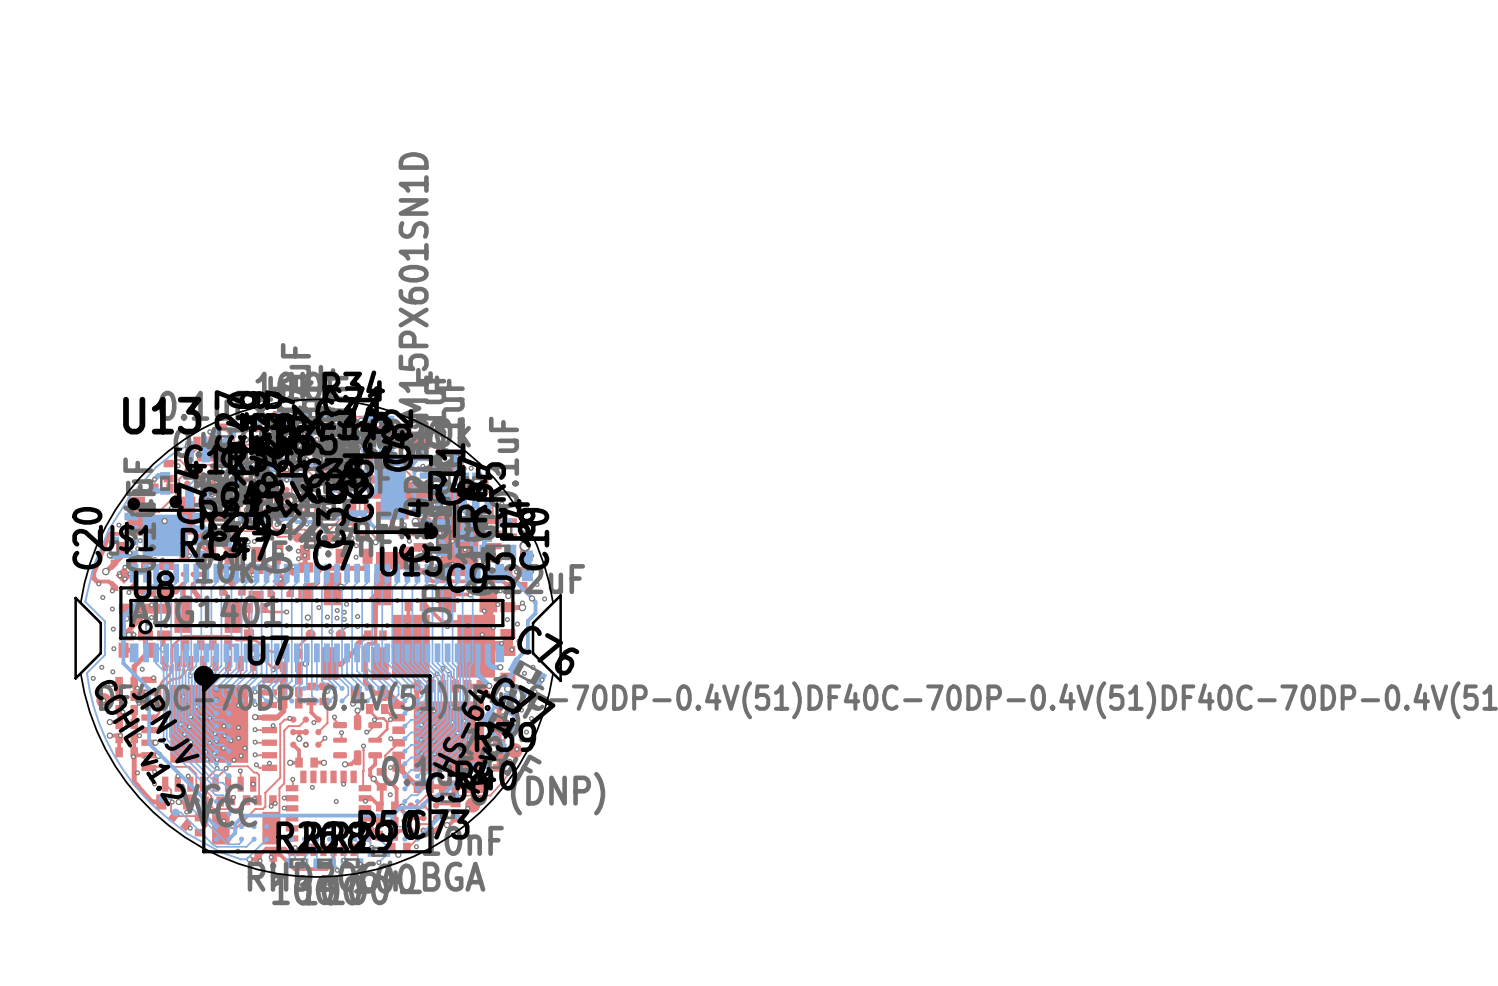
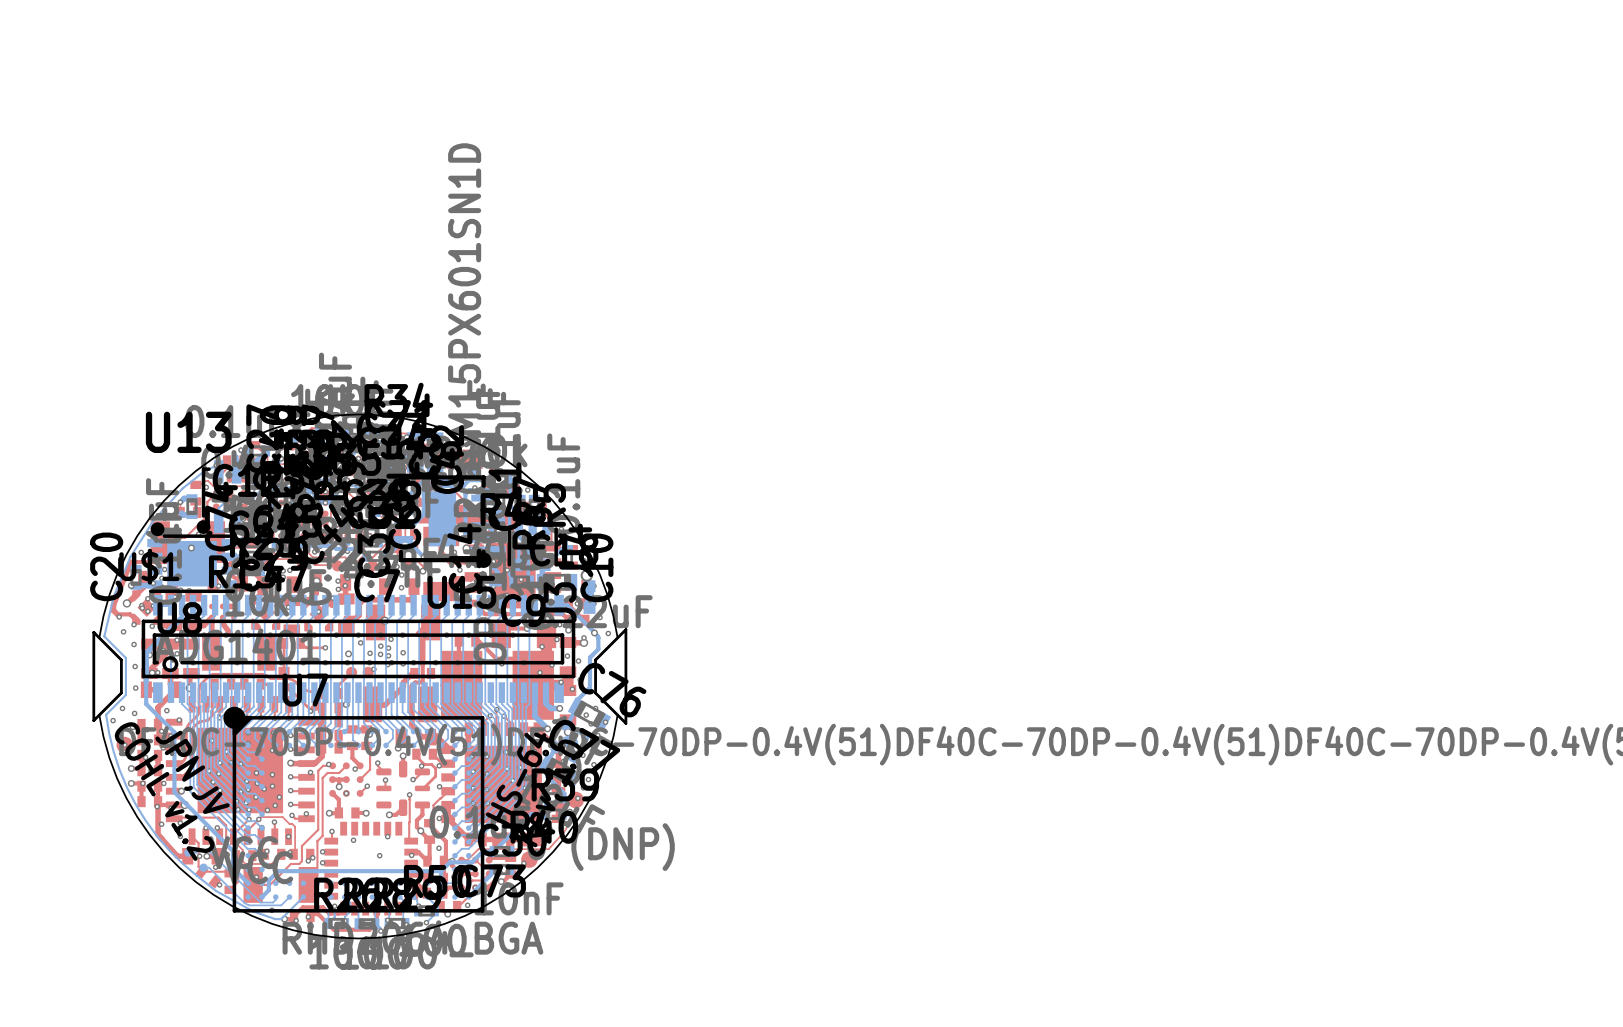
part position: (340, 634) -> (368, 672)

